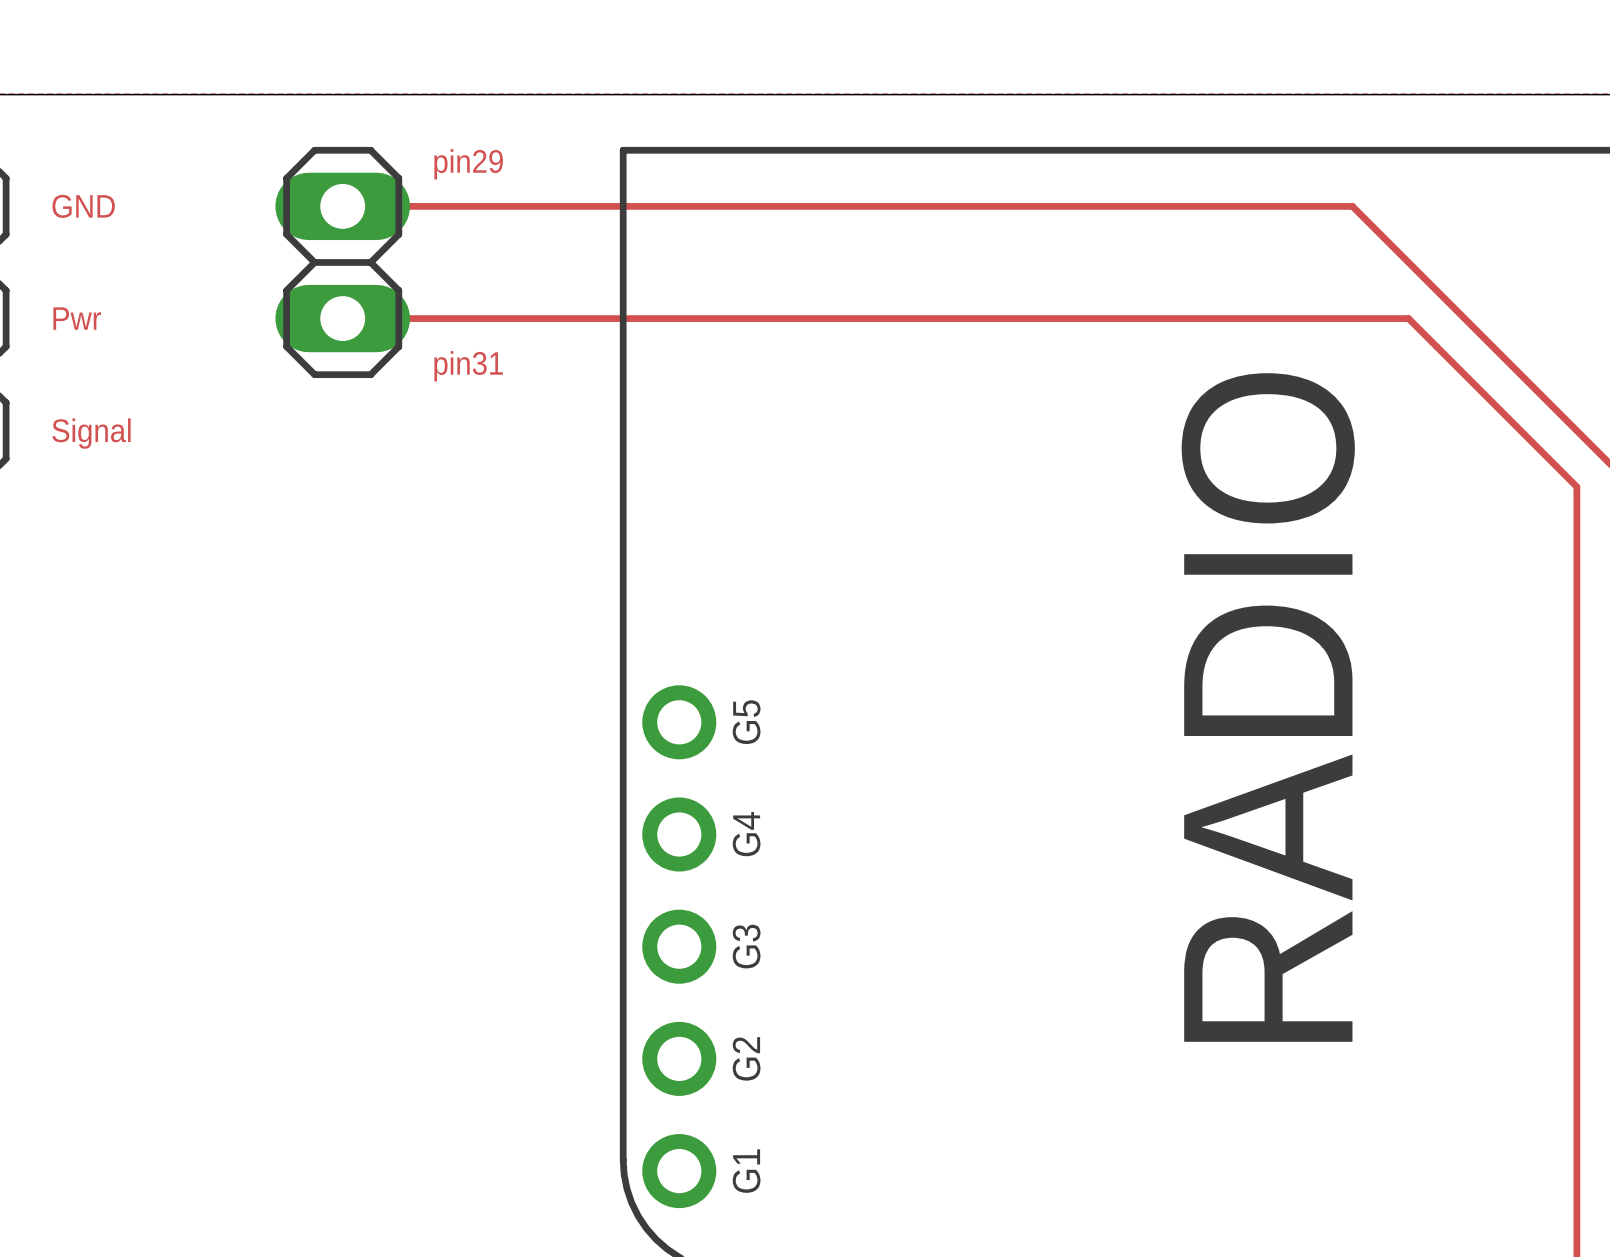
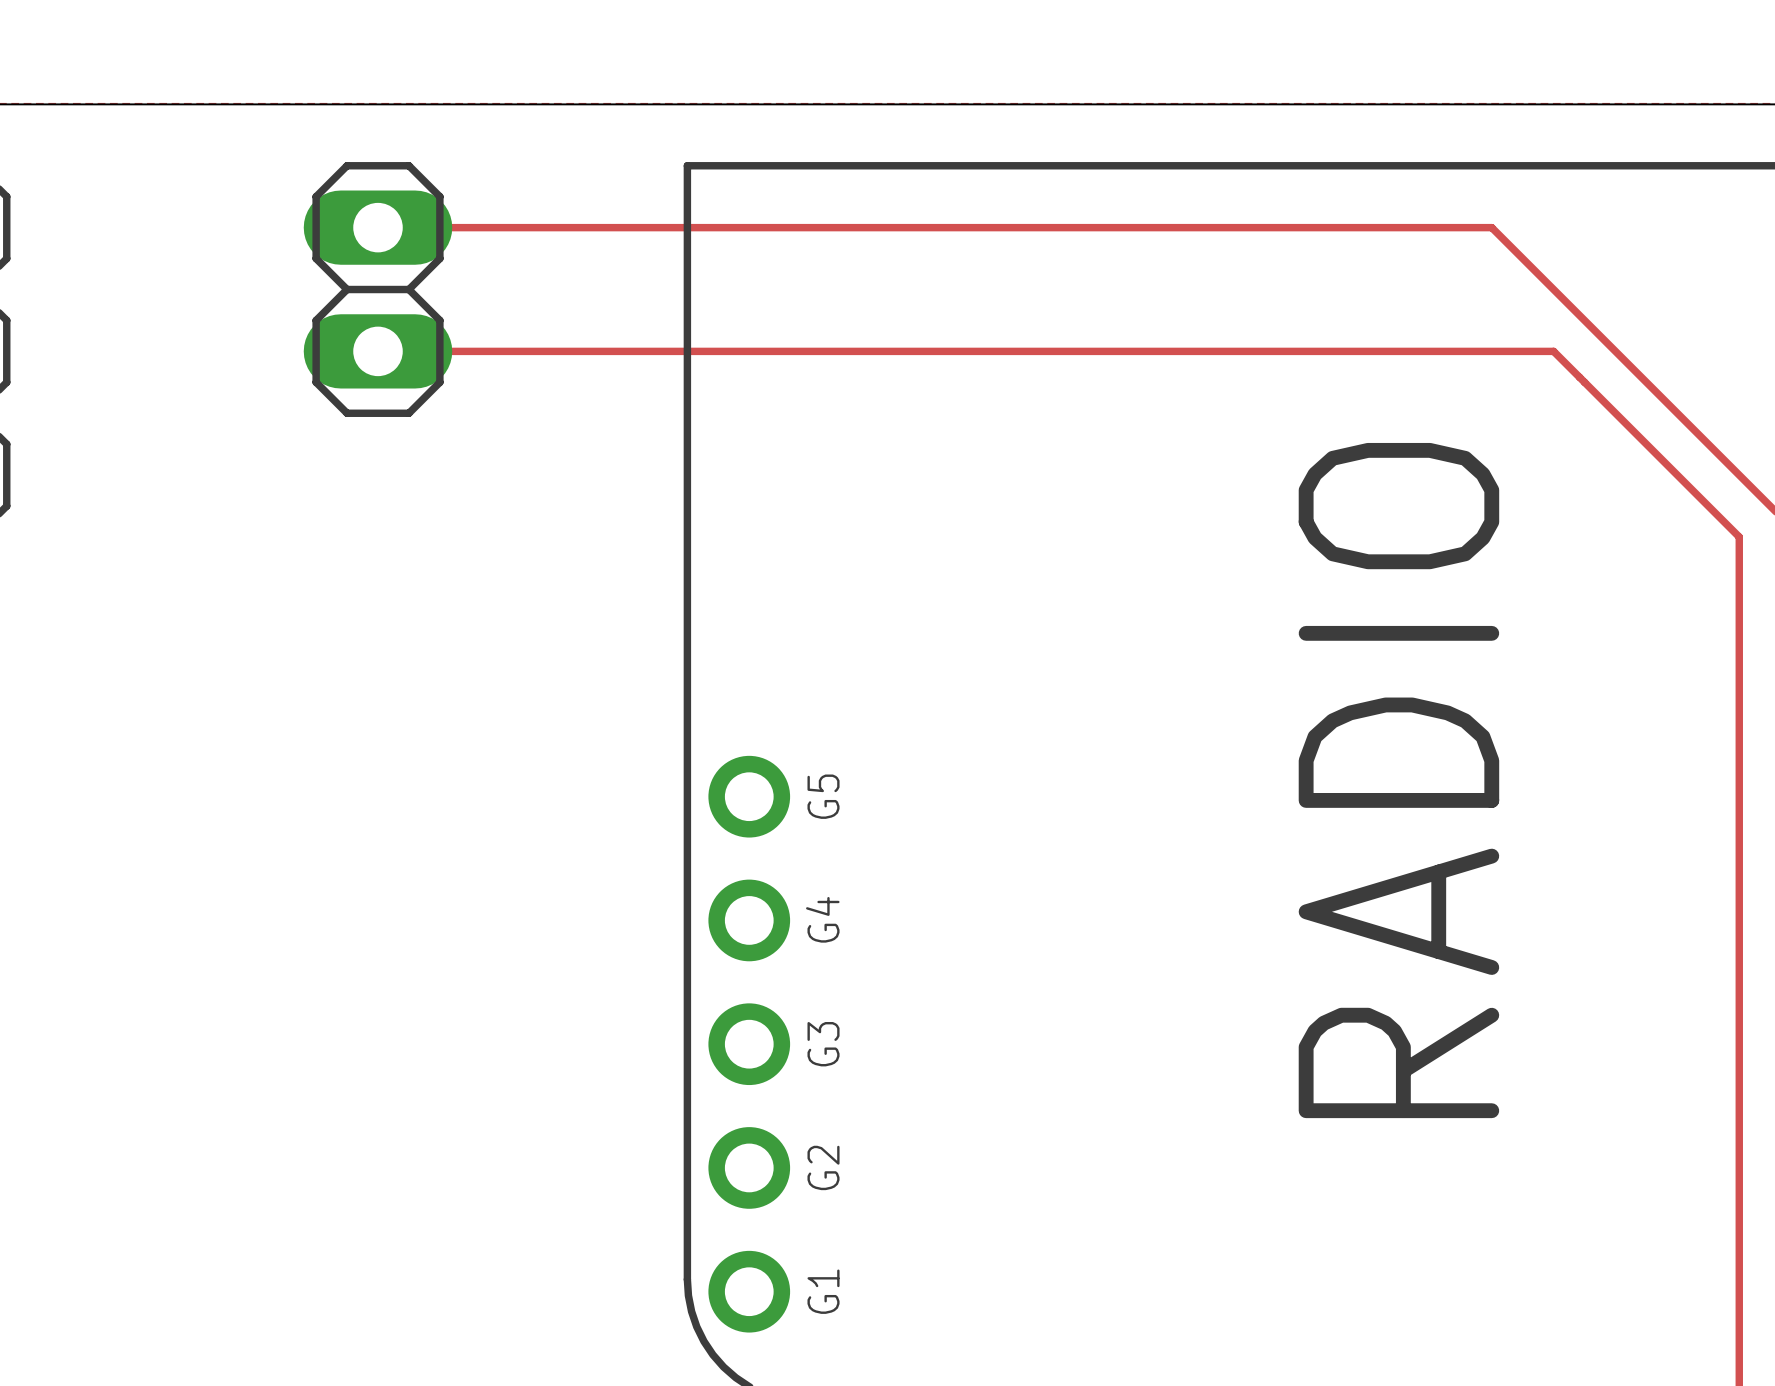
text: pin29 (468, 164) -> none
text: GND (83, 206) -> none
text: Pwr (77, 318) -> none
text: pin31 (468, 366) -> none
text: Signal (91, 433) -> none

